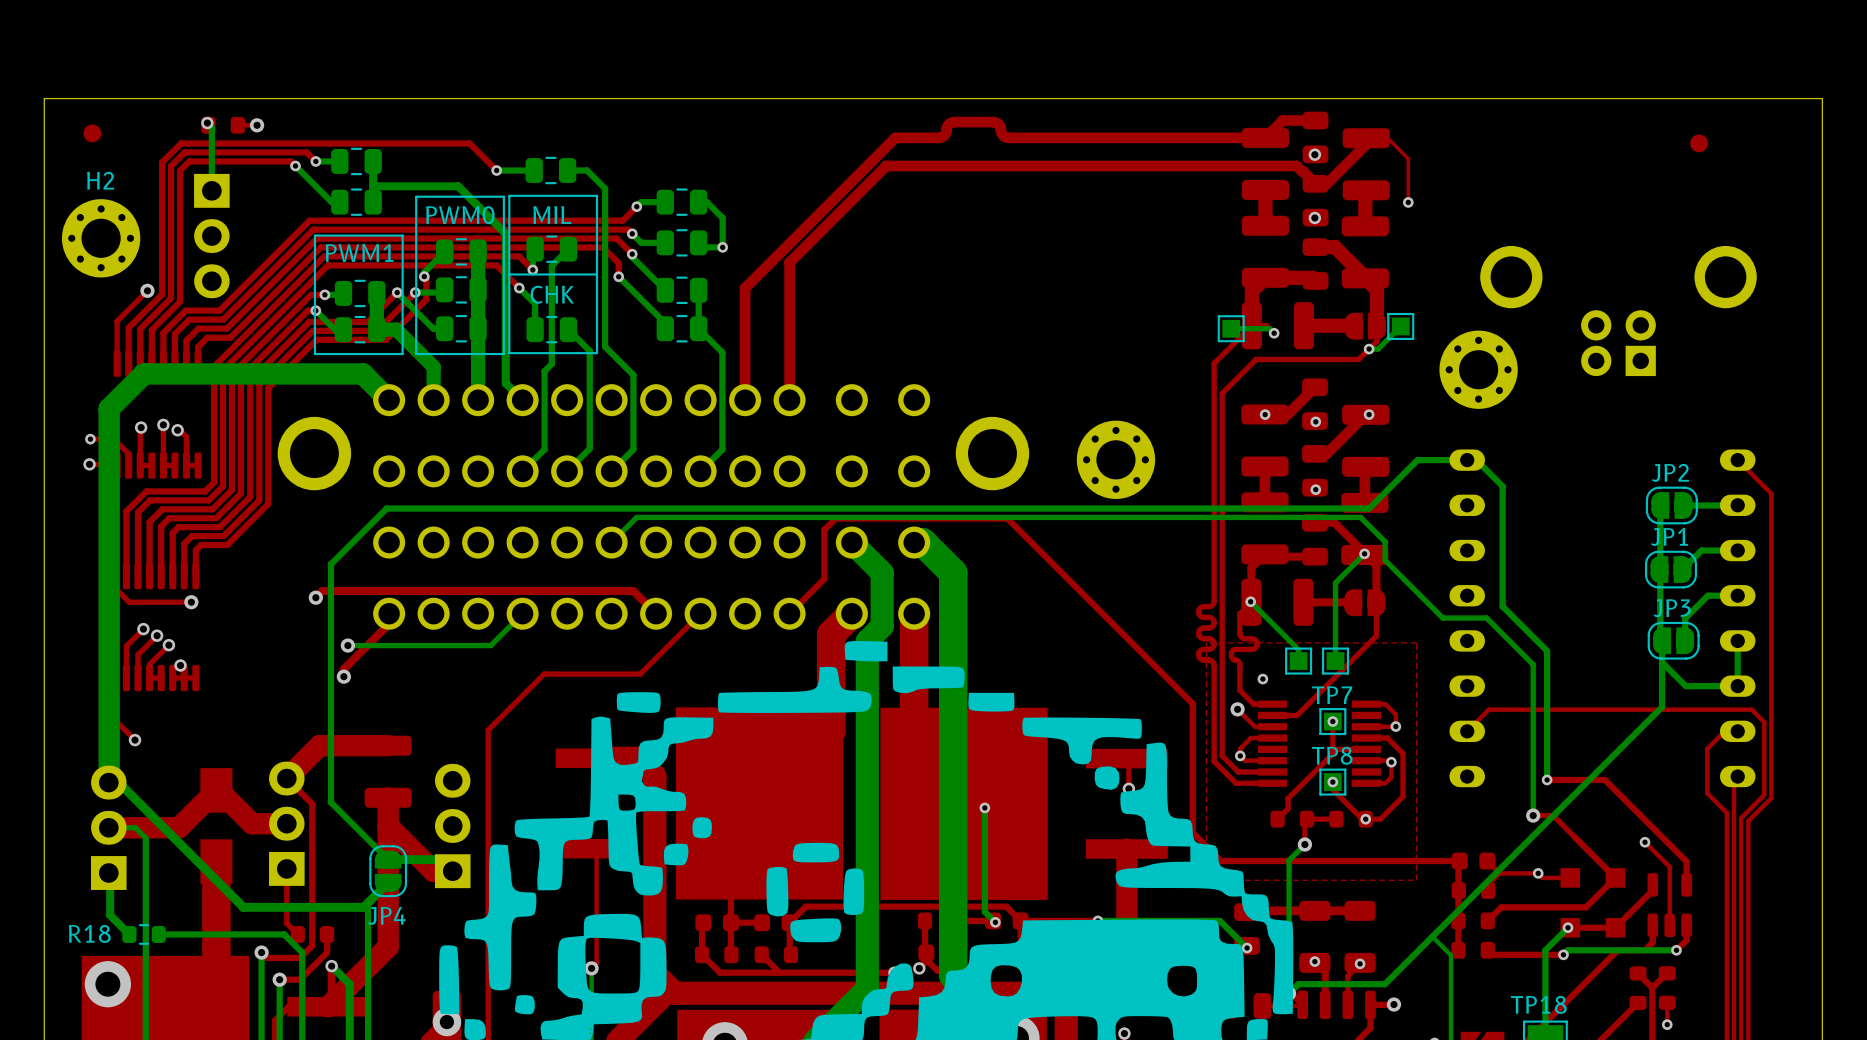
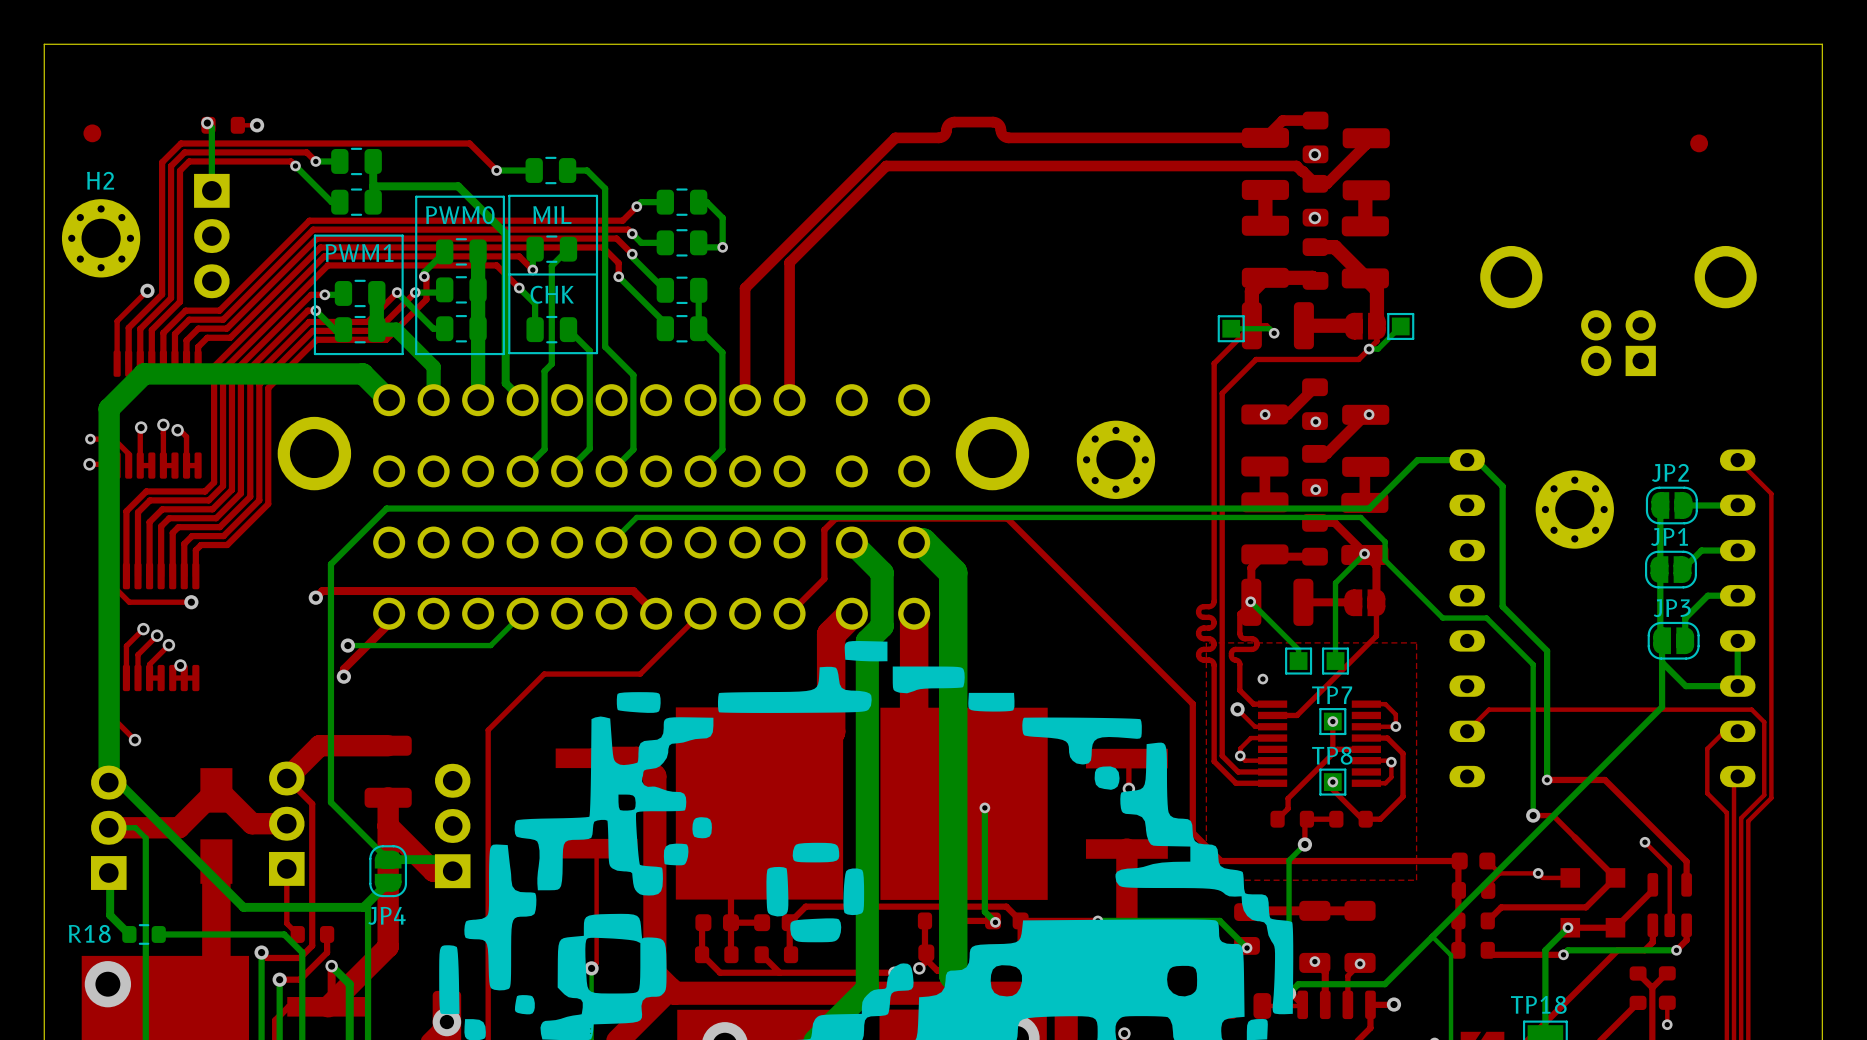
board edge: (1822, 98) (44, 98) -> (1822, 98) (1822, 44) (44, 44) (44, 98)
top track: (1366, 138) (1387, 138) (1408, 158) (1408, 202) -> none
via: (1408, 202) -> none
part position: (1478, 369) -> (1574, 509)
via: (1365, 819) -> none

